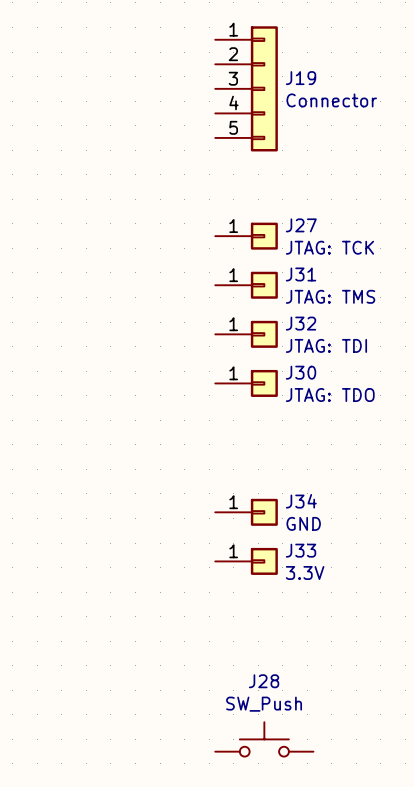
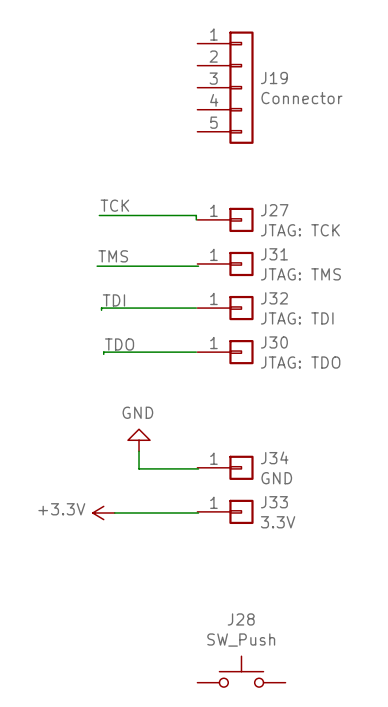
label: none -> TCK (114, 205)
wire: none -> (99, 215) (196, 215) (196, 219)
label: none -> TMS (113, 256)
wire: none -> (97, 266) (198, 266)
label: none -> TDI (113, 300)
wire: none -> (196, 308) (101, 308) (101, 310)
label: none -> TDO (119, 344)
wire: none -> (196, 352) (103, 352) (103, 354)
power symbol: none -> GND (139, 440)
wire: none -> (139, 451) (139, 468) (198, 468)
power symbol: none -> +3.3V (103, 513)
wire: none -> (114, 513) (198, 513)

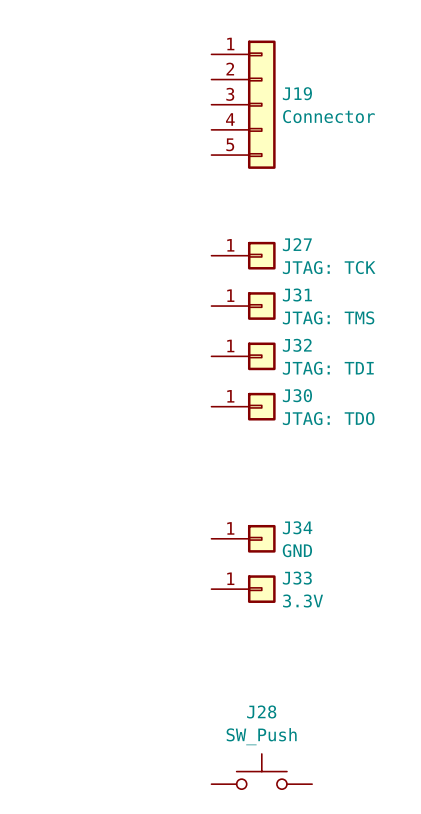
label: TCK (114, 205) -> none
wire: (99, 215) (196, 215) (196, 219) -> none
label: TMS (113, 256) -> none
wire: (97, 266) (198, 266) -> none
label: TDI (113, 300) -> none
wire: (196, 308) (101, 308) (101, 310) -> none
label: TDO (119, 344) -> none
wire: (196, 352) (103, 352) (103, 354) -> none
power symbol: GND (139, 440) -> none
wire: (139, 451) (139, 468) (198, 468) -> none
power symbol: +3.3V (103, 513) -> none
wire: (114, 513) (198, 513) -> none

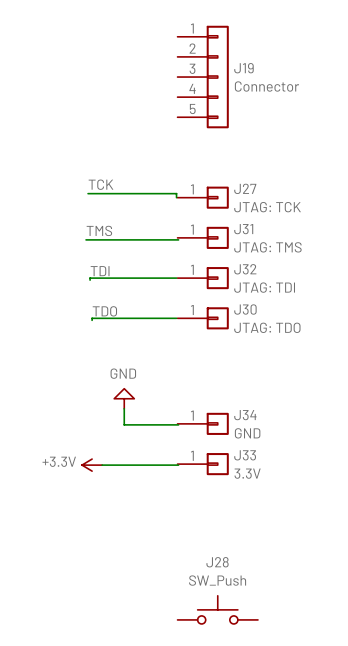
label: none -> TCK (101, 184)
wire: none -> (88, 193) (176, 193) (176, 197)
label: none -> TMS (99, 230)
wire: none -> (86, 239) (178, 239)
label: none -> TDI (100, 271)
wire: none -> (176, 278) (90, 278) (90, 280)
label: none -> TDO (104, 311)
wire: none -> (176, 318) (92, 318) (92, 320)
power symbol: none -> GND (124, 398)
wire: none -> (124, 408) (124, 424) (178, 424)
power symbol: none -> +3.3V (92, 465)
wire: none -> (102, 465) (178, 465)

